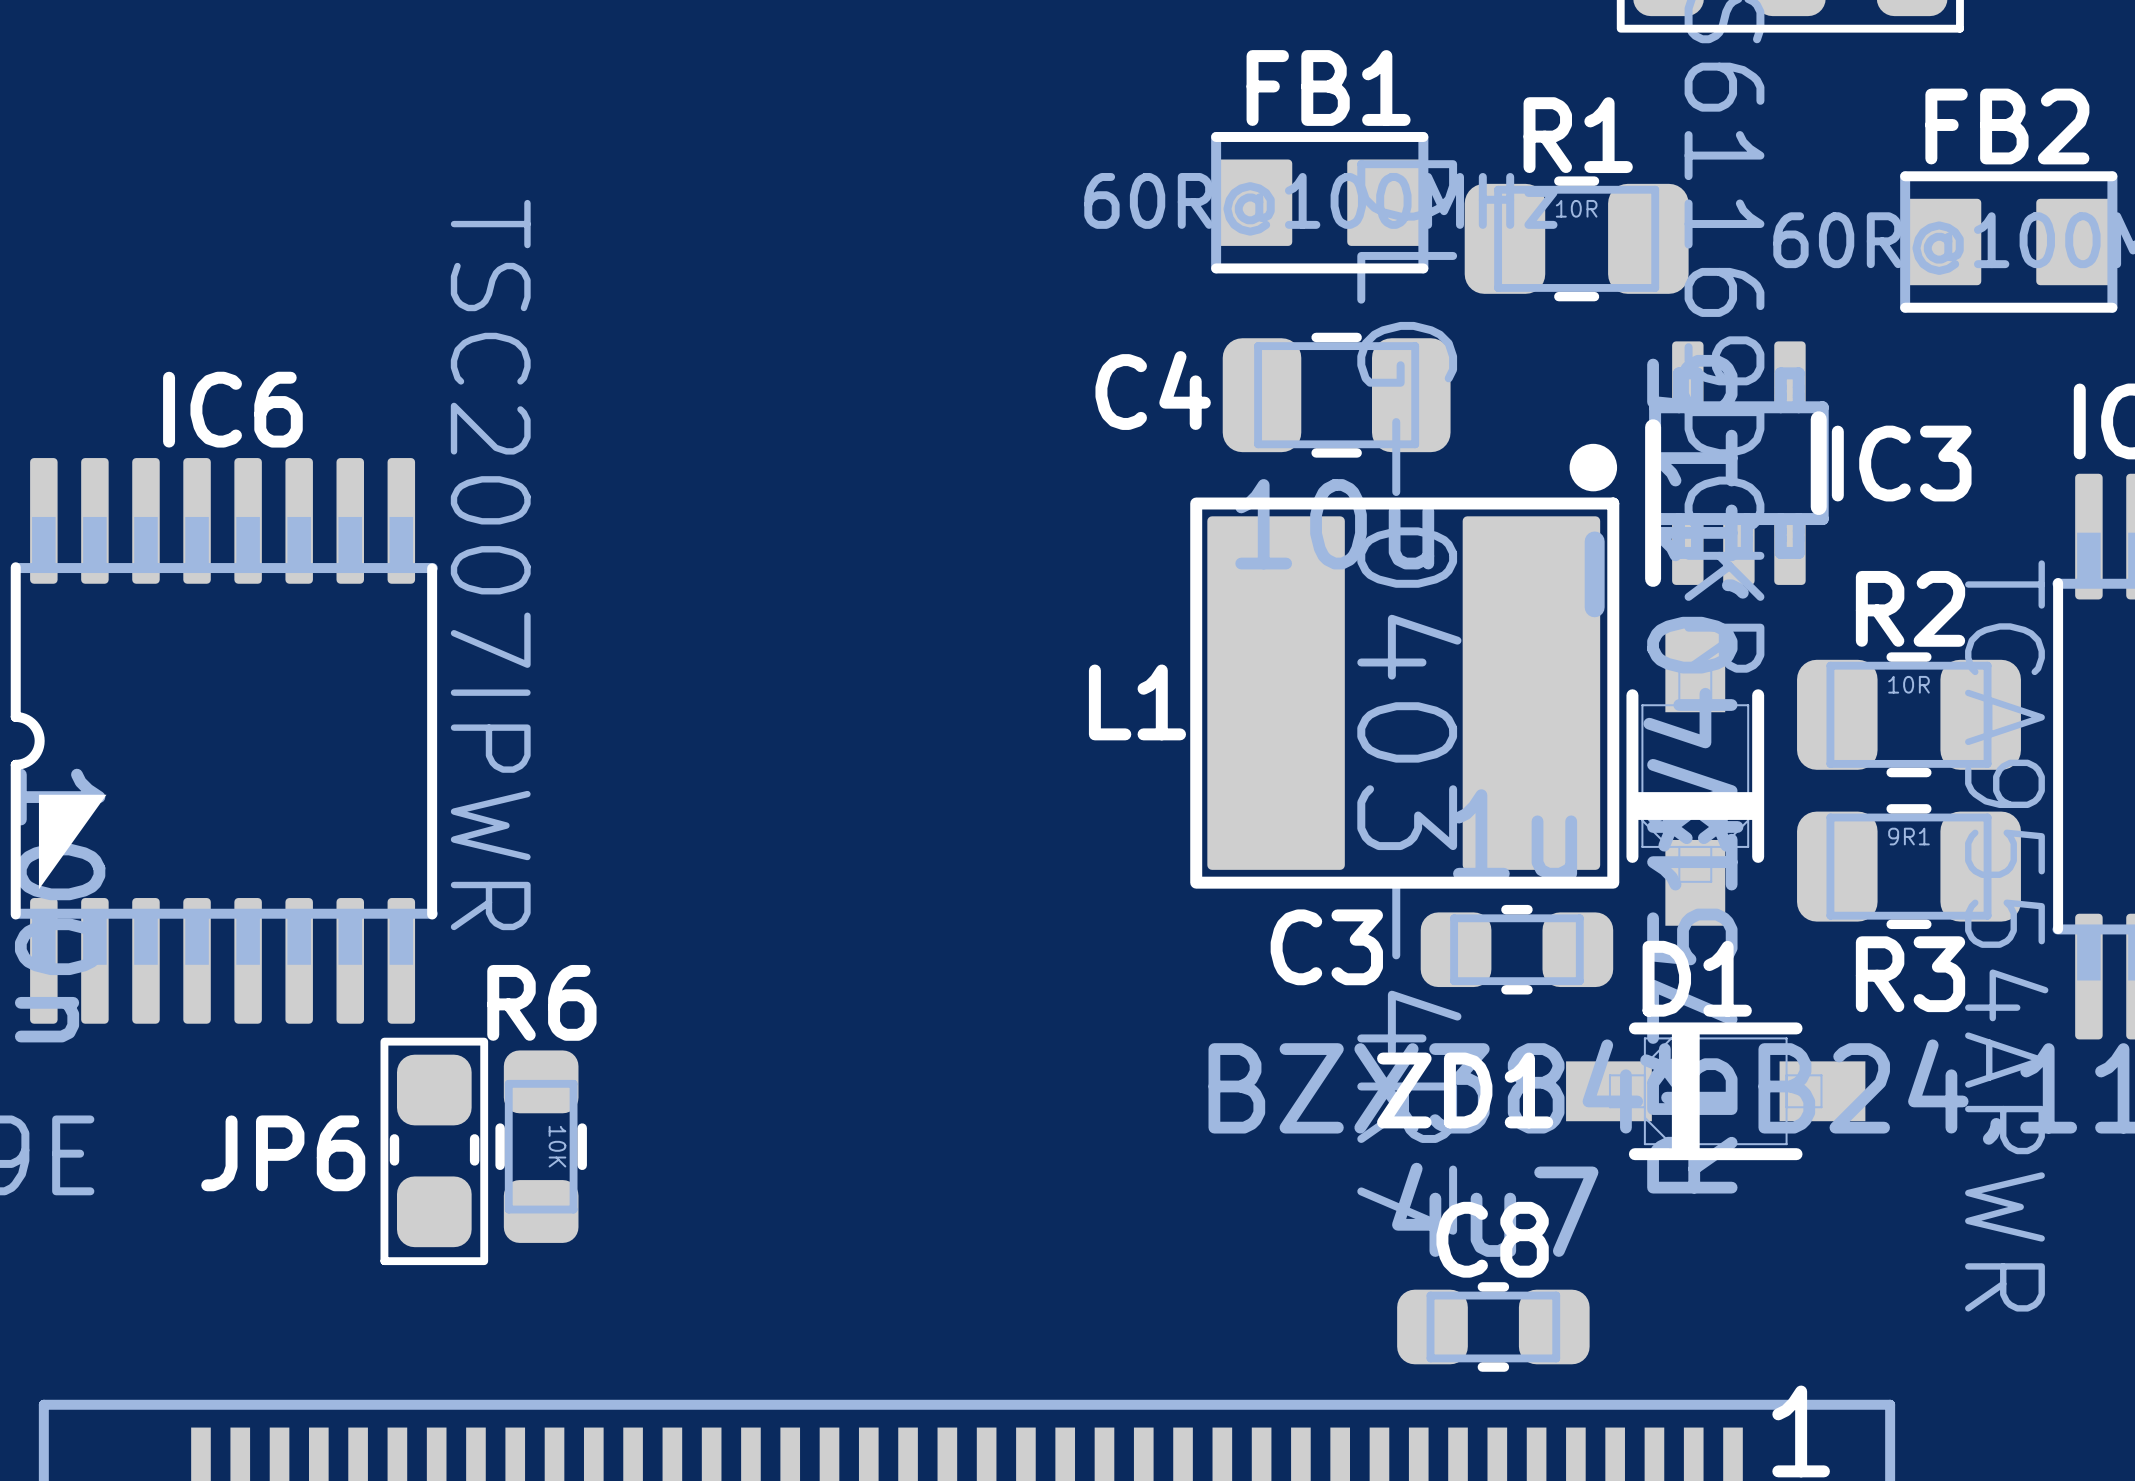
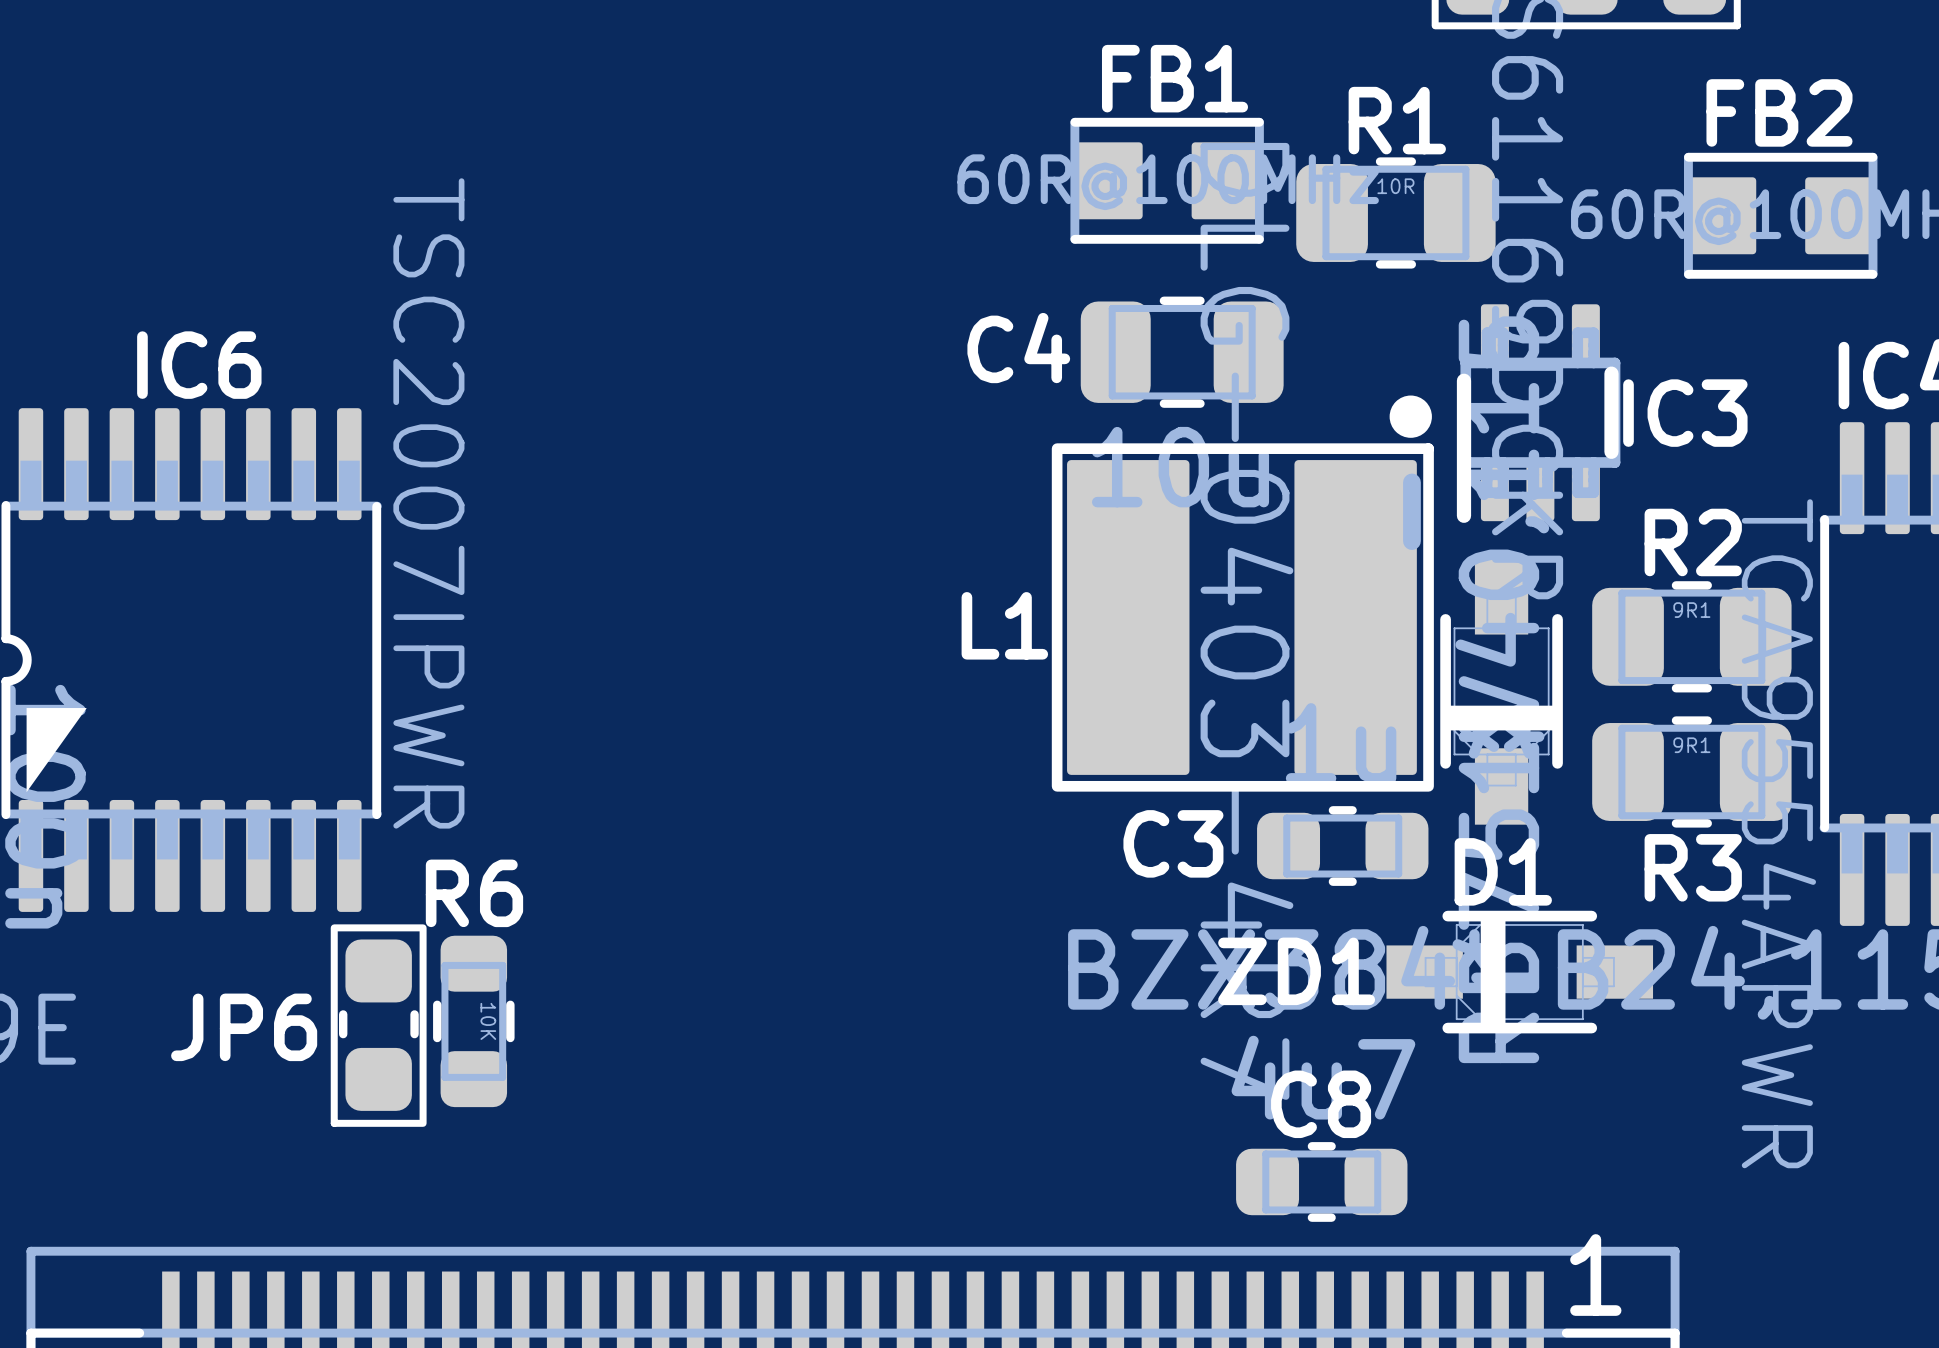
R2 value: 10R (1908, 684) -> 9R1 (1691, 610)

